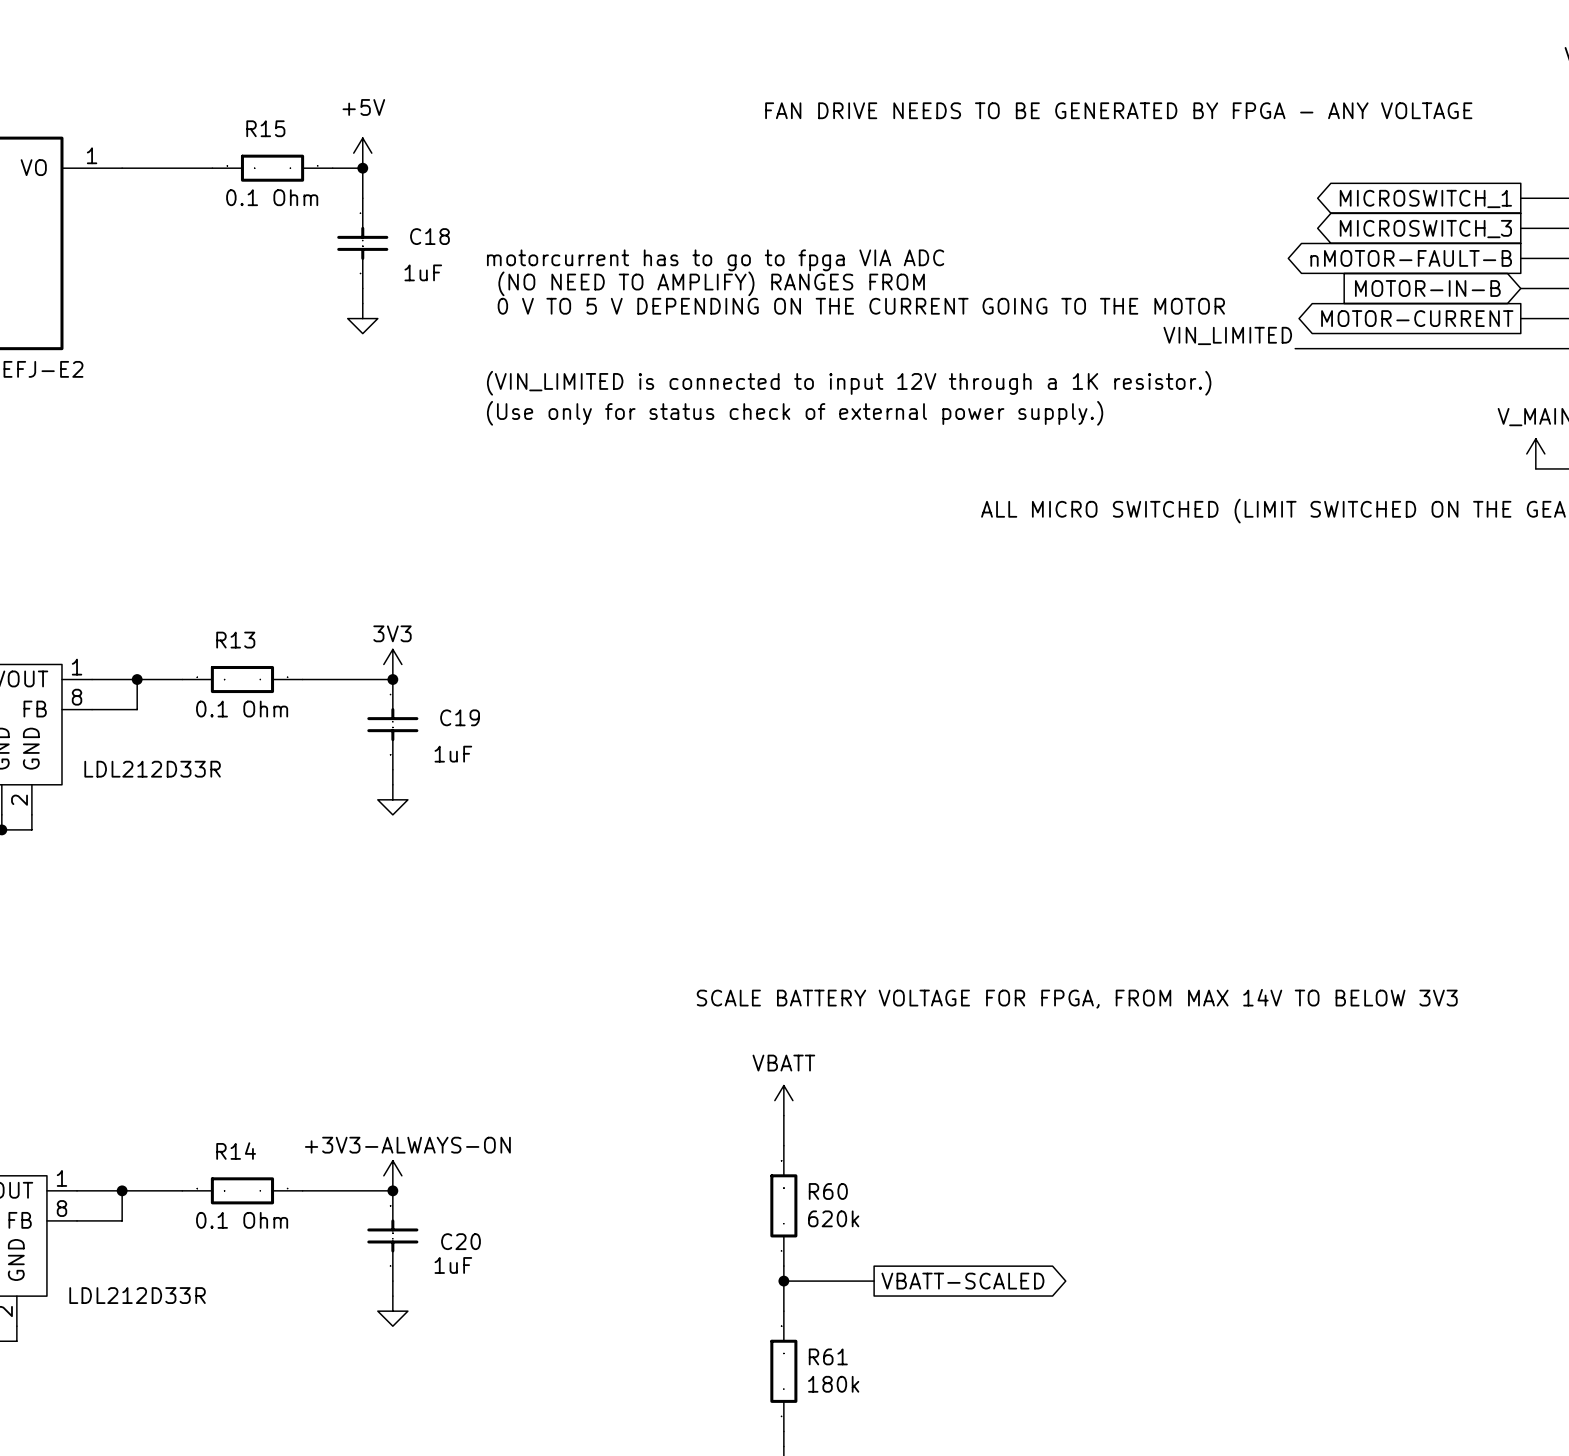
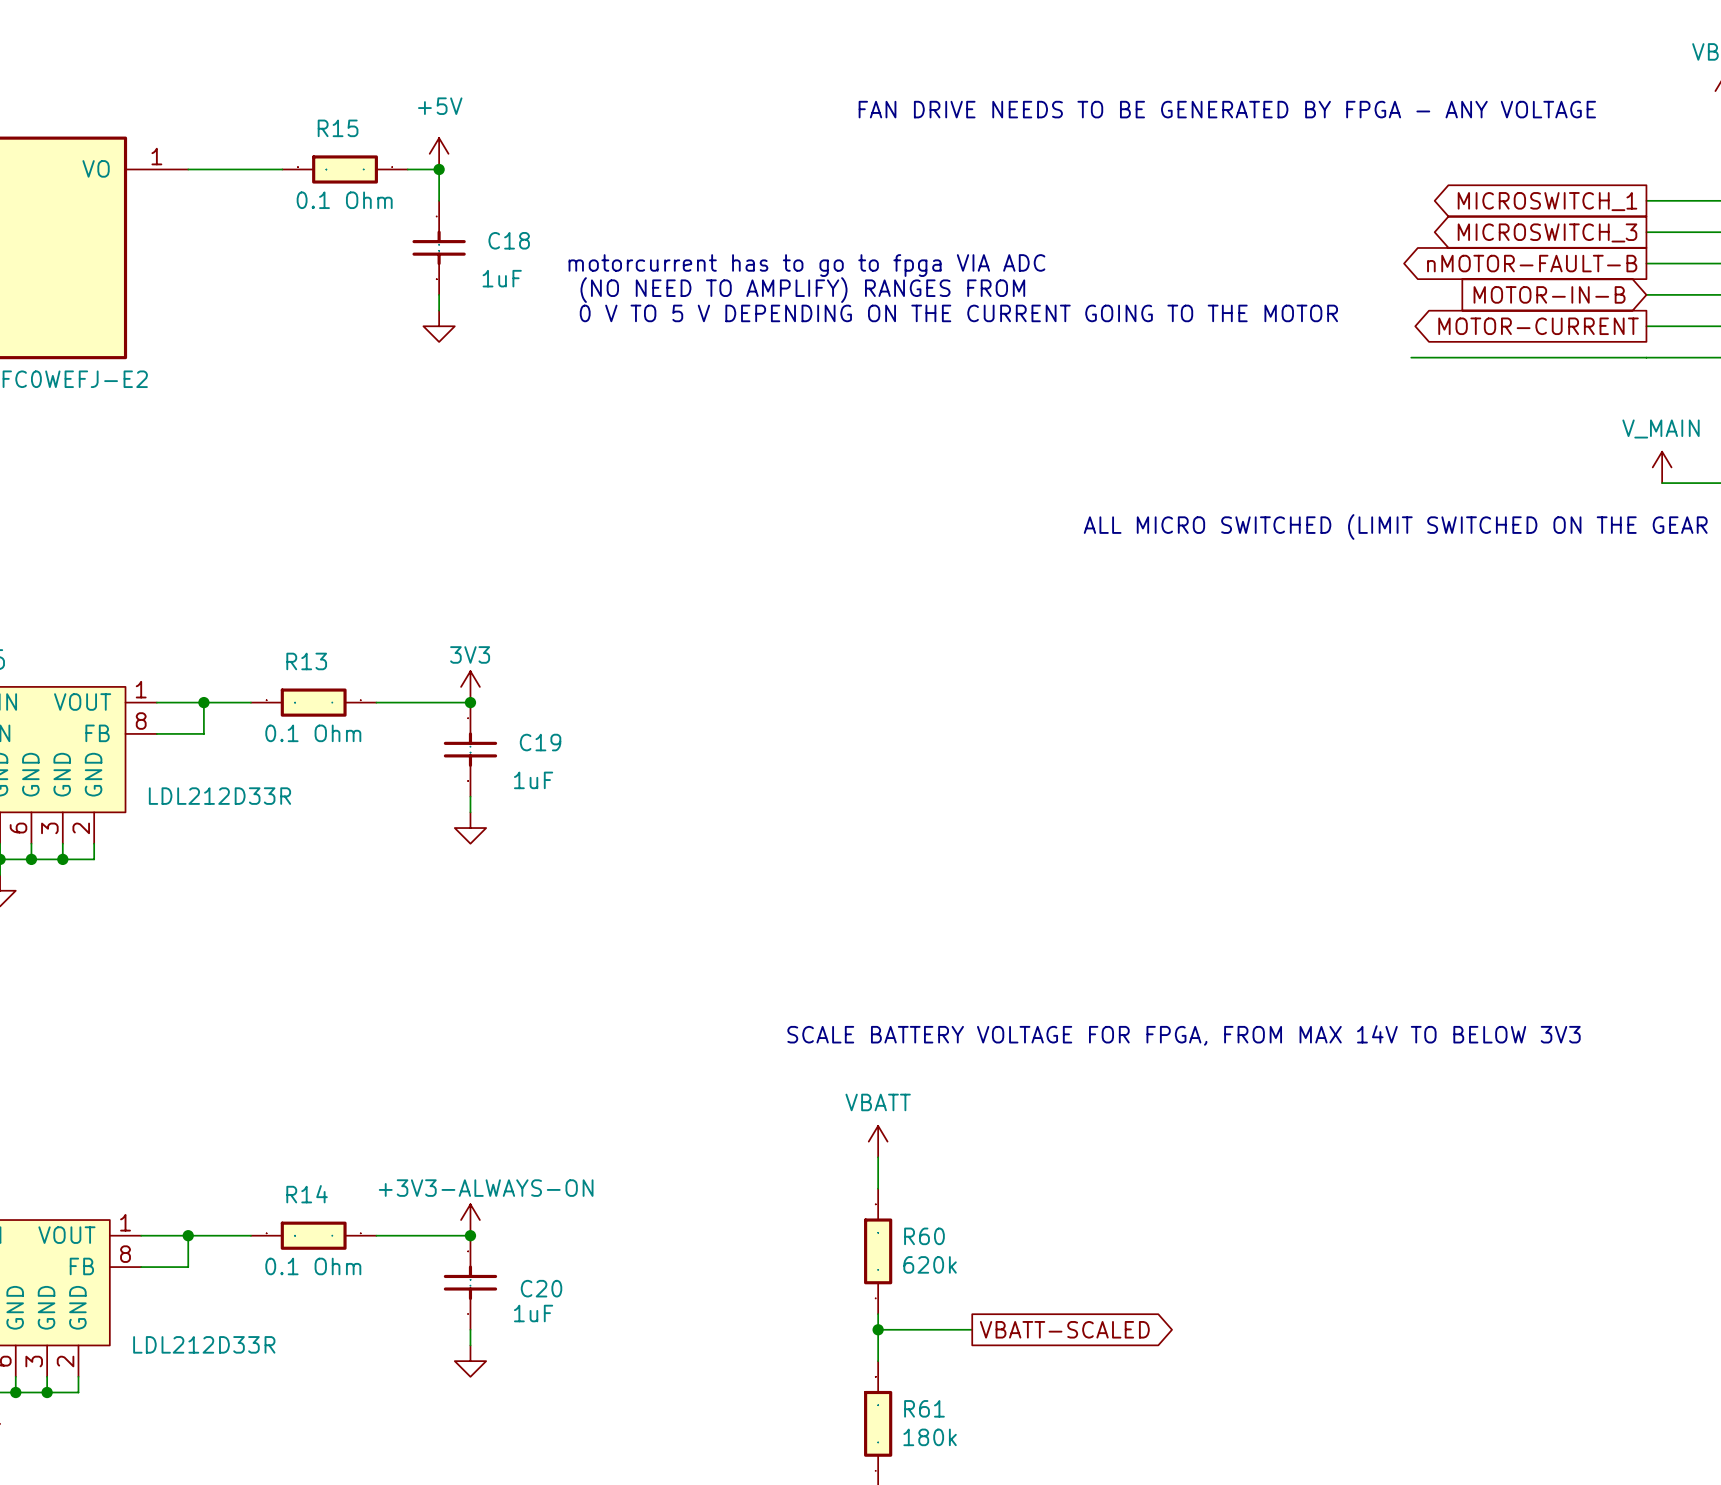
label: VIN_LIMITED (1227, 335) -> none
text: (VIN_LIMITED is connected to input 12V through a 1K resistor.) (849, 383) -> none
text: (Use only for status check of external power supply.) (795, 413) -> none

